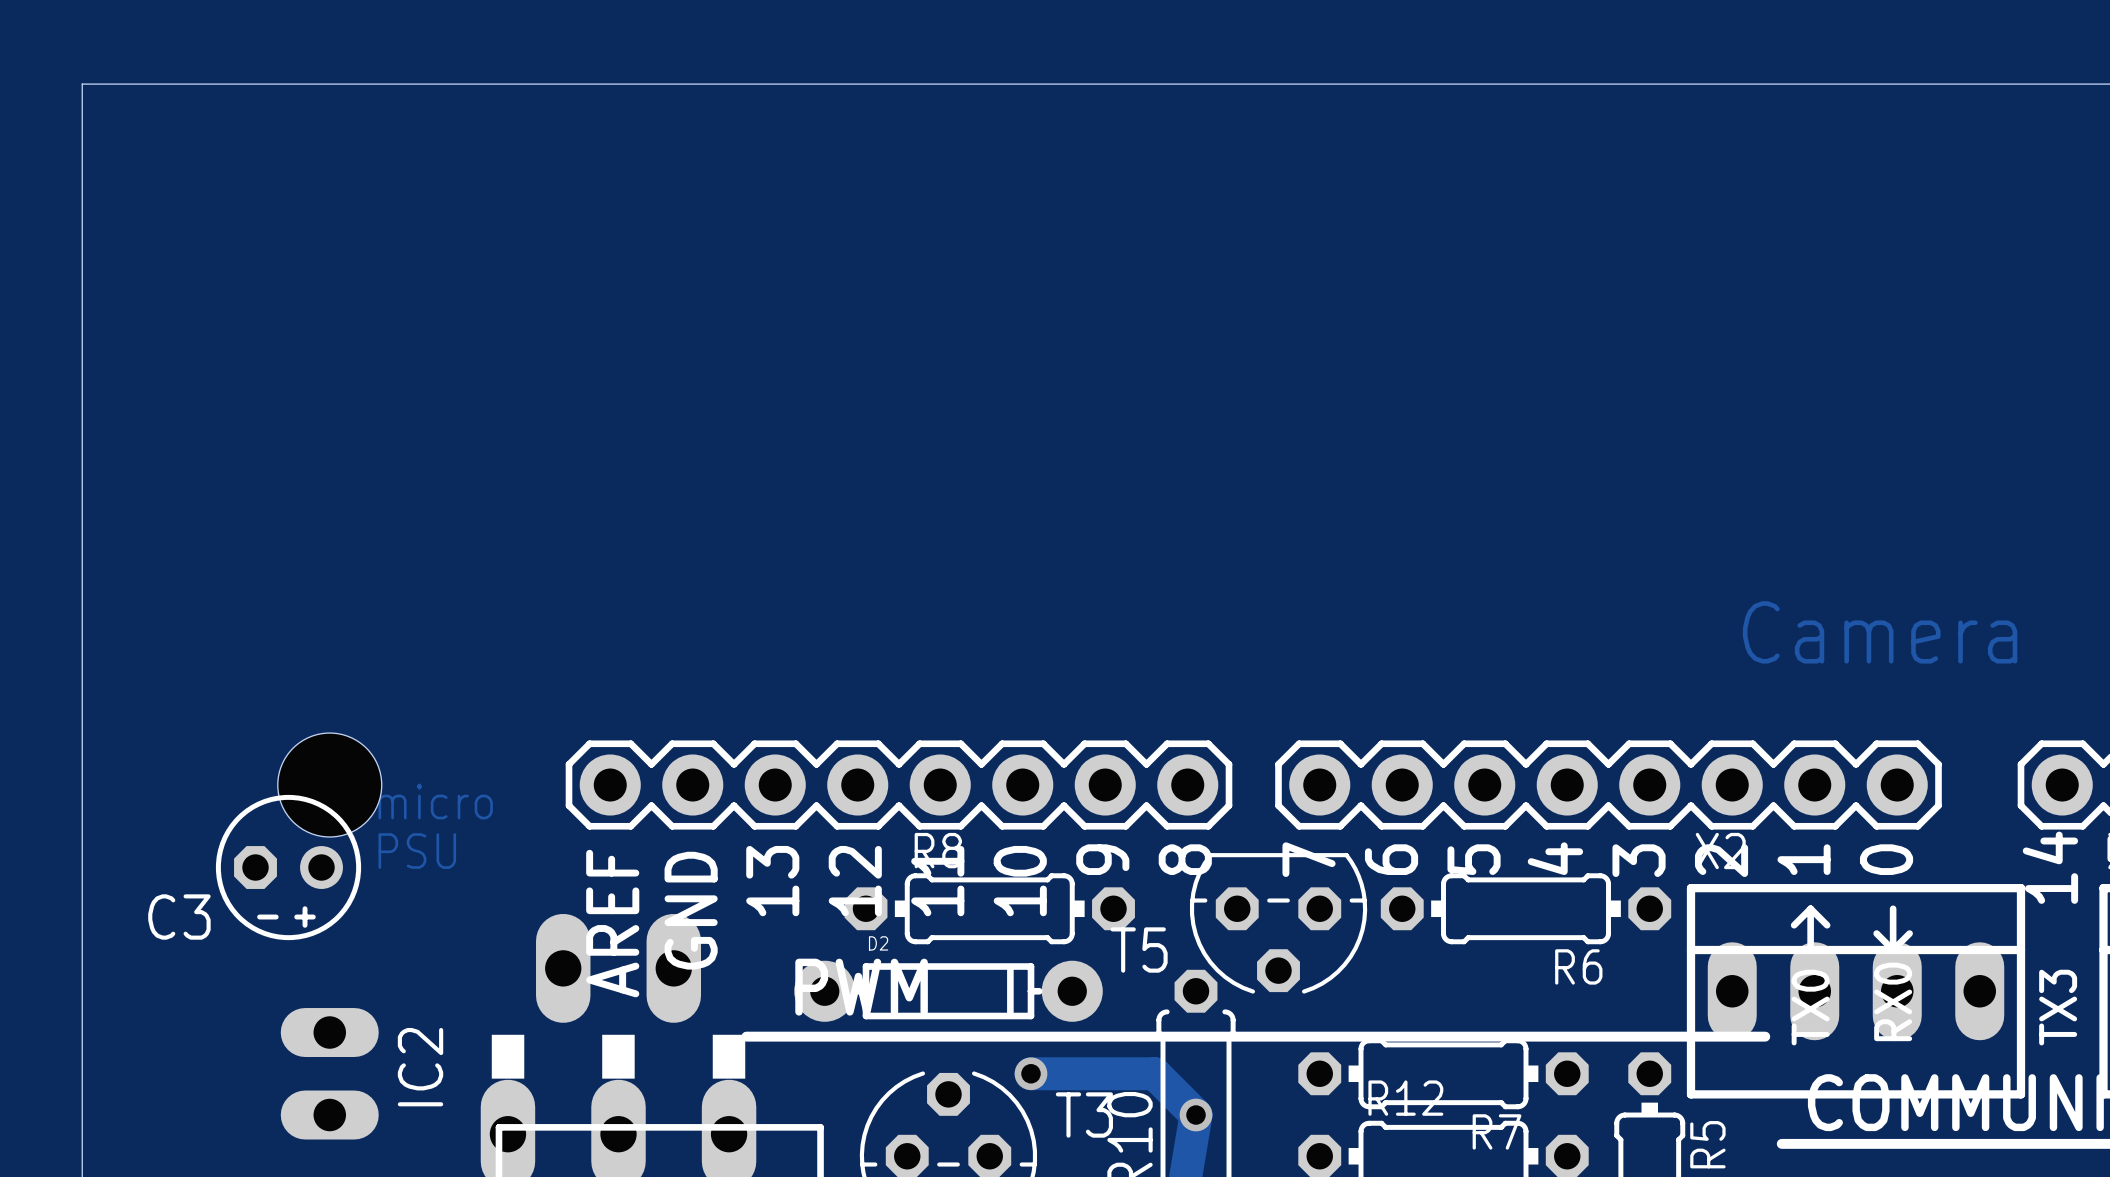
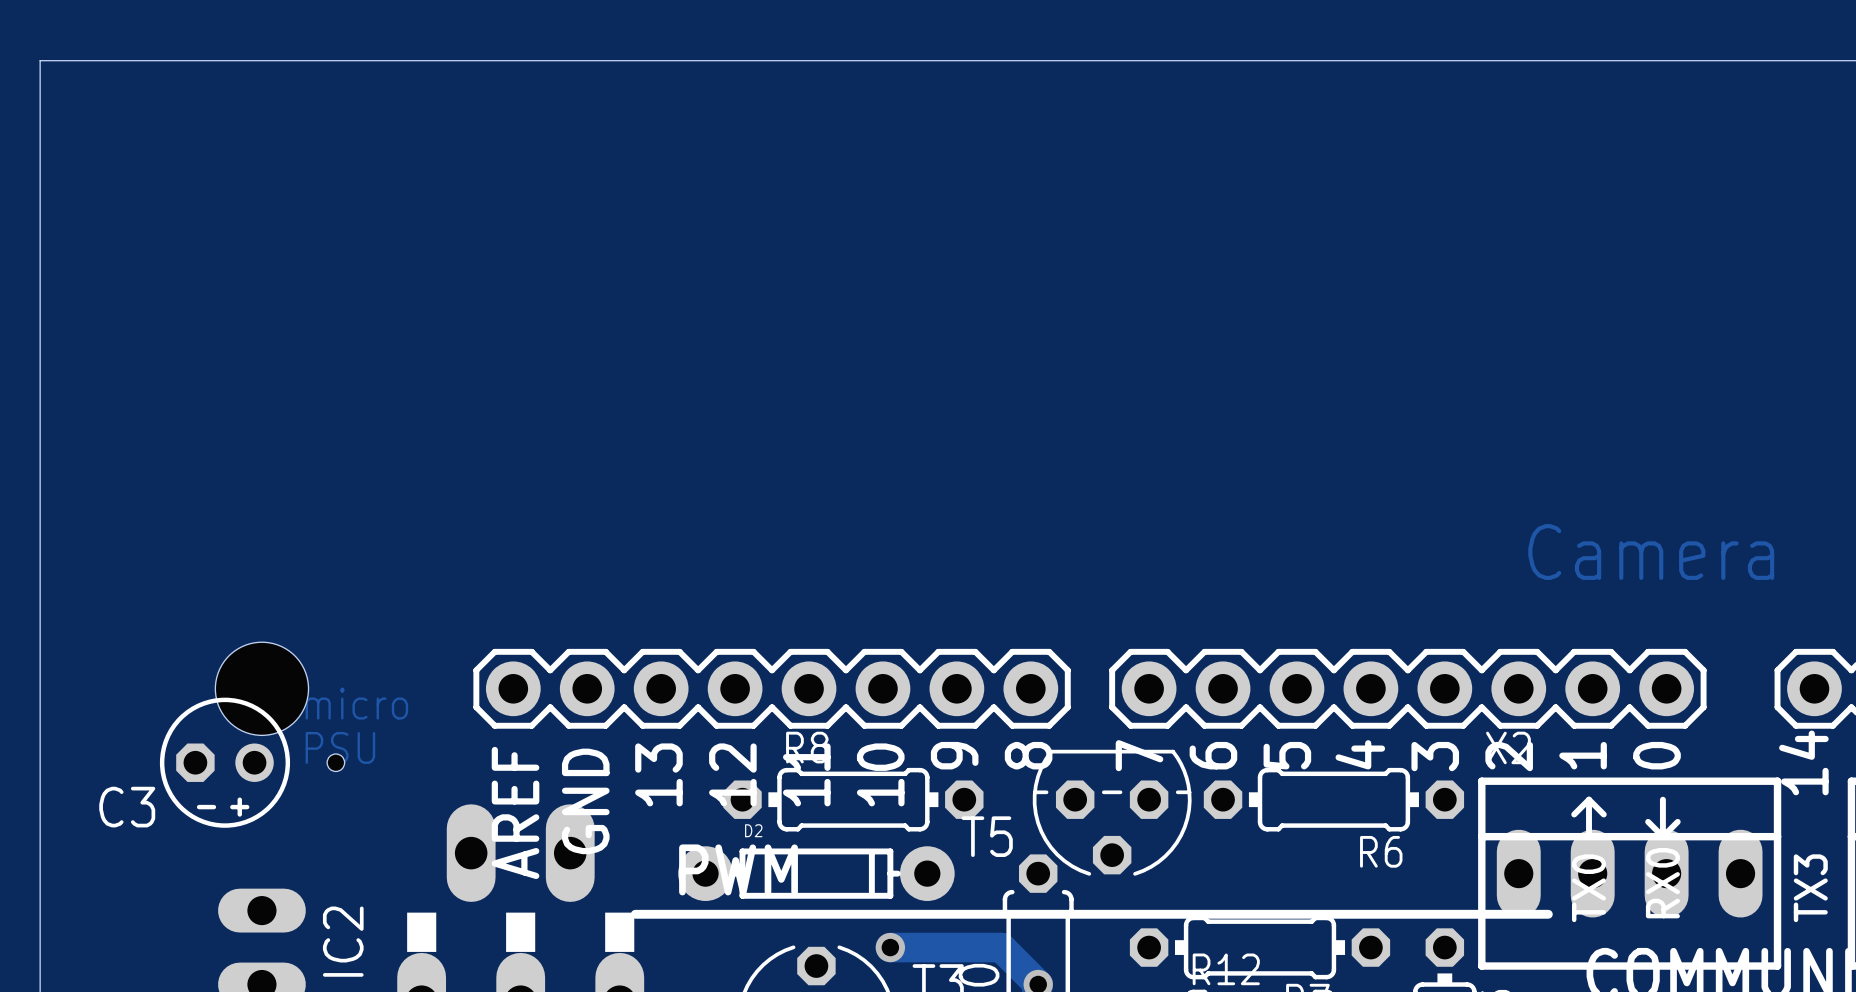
hole: none -> (335, 762)

